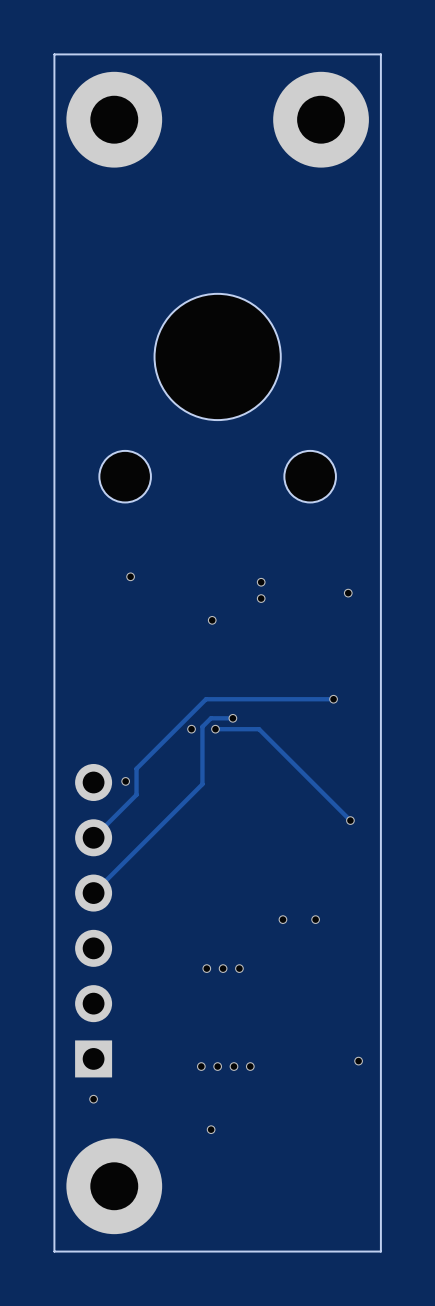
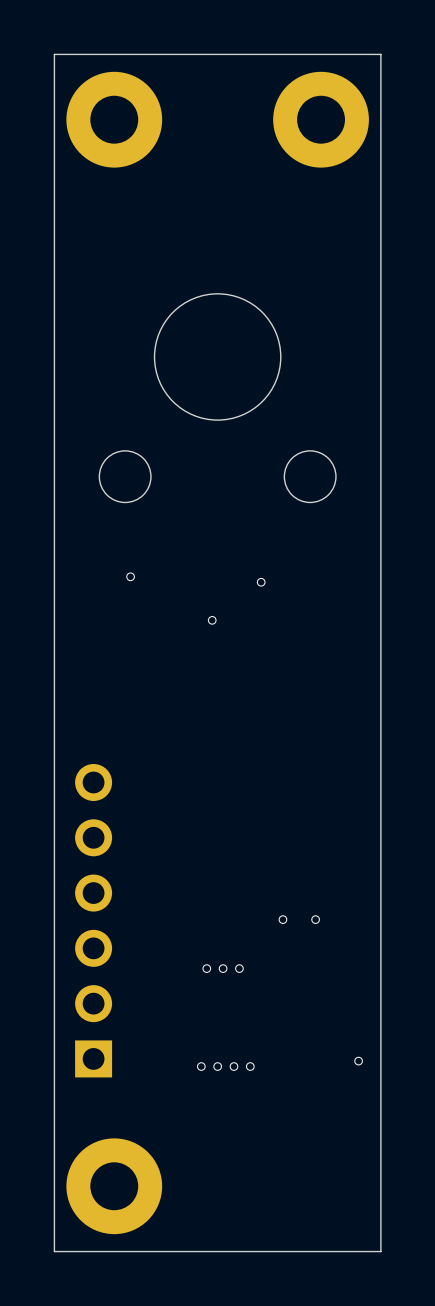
via: (348, 593) -> none
via: (261, 598) -> none
track: (333, 699) (206, 699) (136, 768) (136, 794) (93, 837) -> none
via: (333, 699) -> none
track: (232, 718) (210, 718) (202, 726) (202, 784) (93, 893) -> none
via: (232, 718) -> none
via: (191, 729) -> none
track: (215, 729) (259, 729) (350, 820) -> none
via: (215, 729) -> none
via: (125, 781) -> none
via: (350, 820) -> none
via: (93, 1099) -> none
via: (211, 1129) -> none

